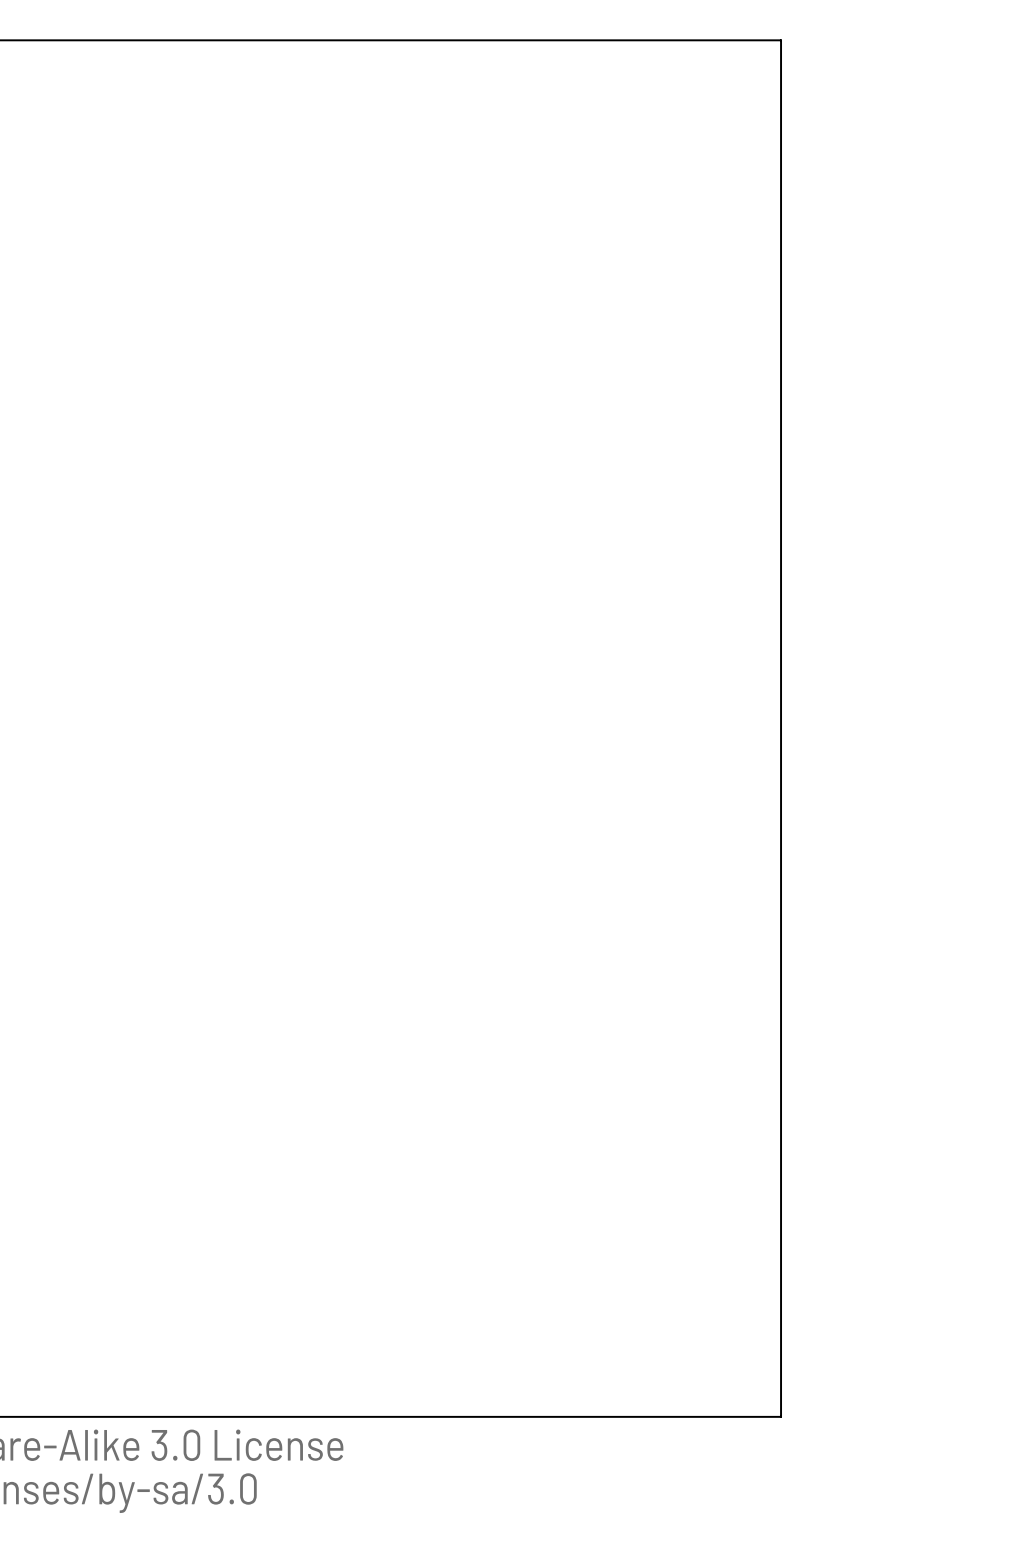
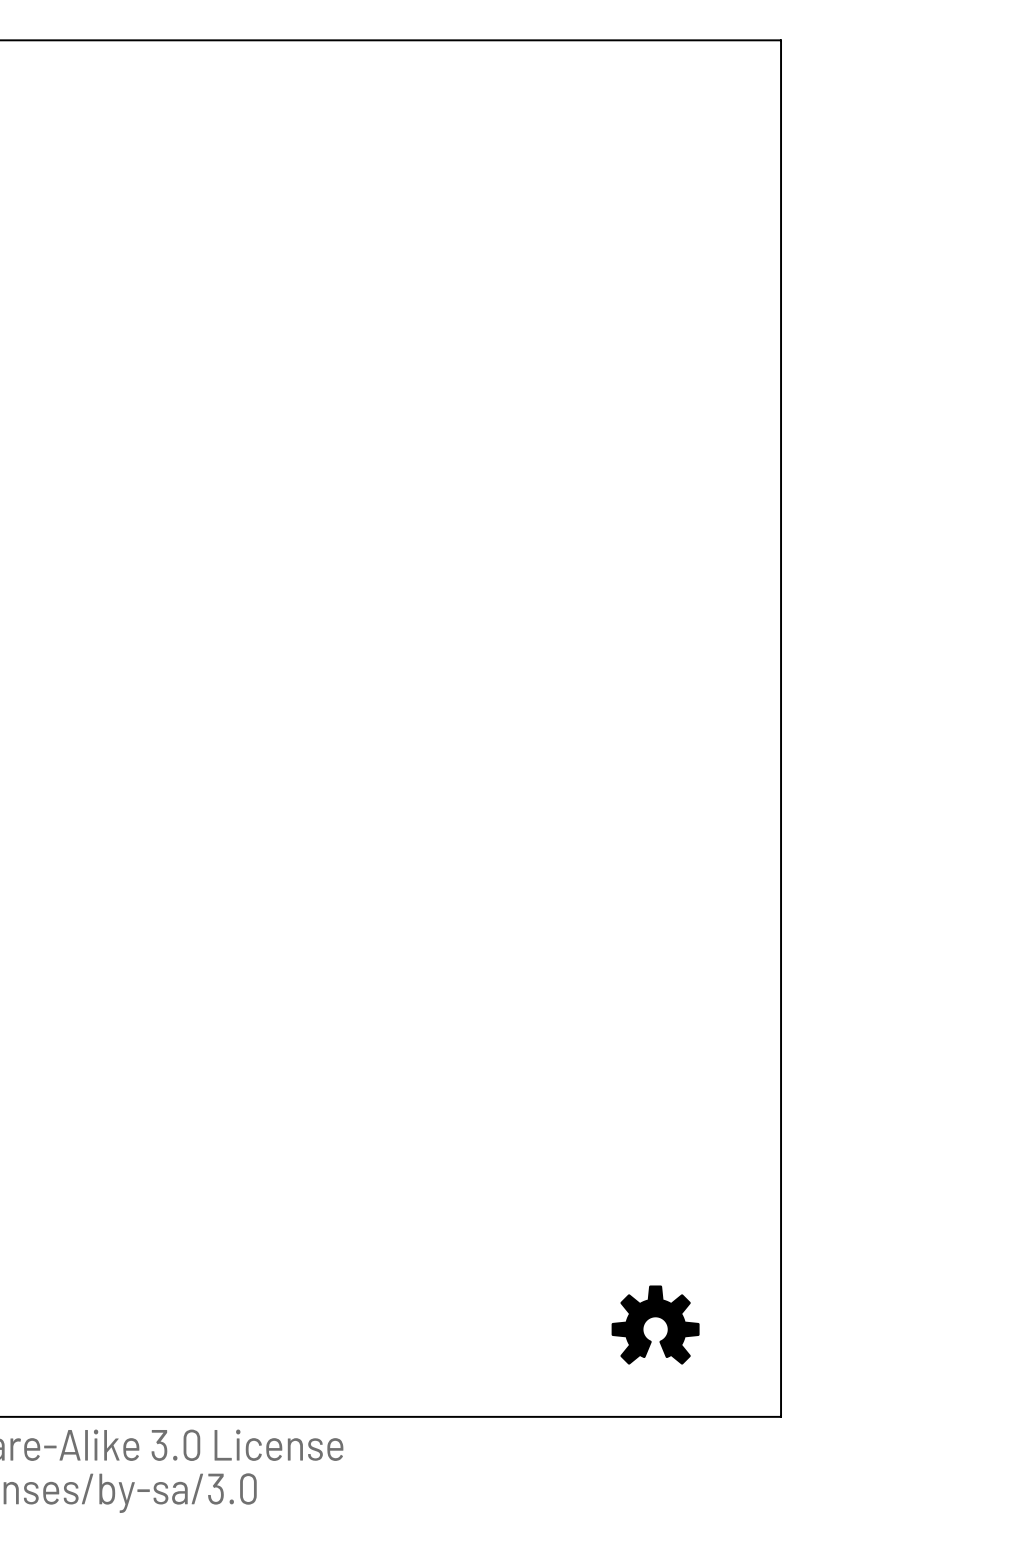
drawing: none -> [611, 1285, 700, 1365]

